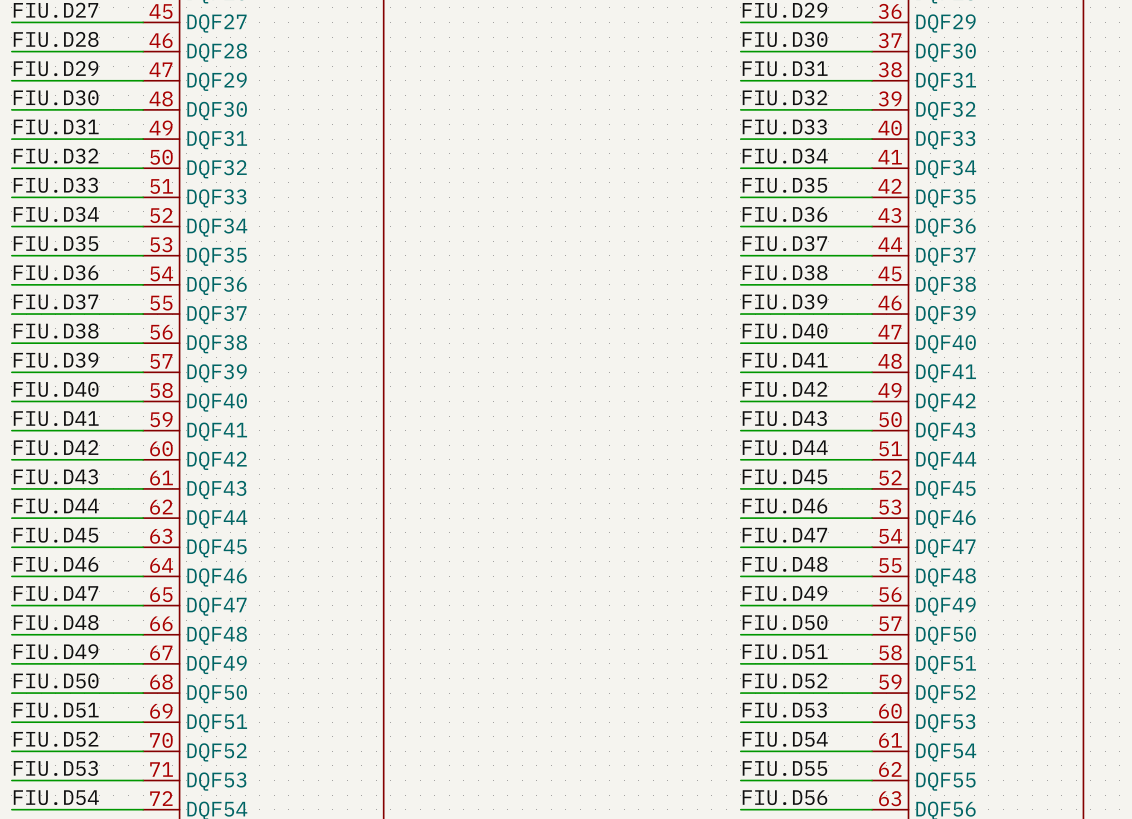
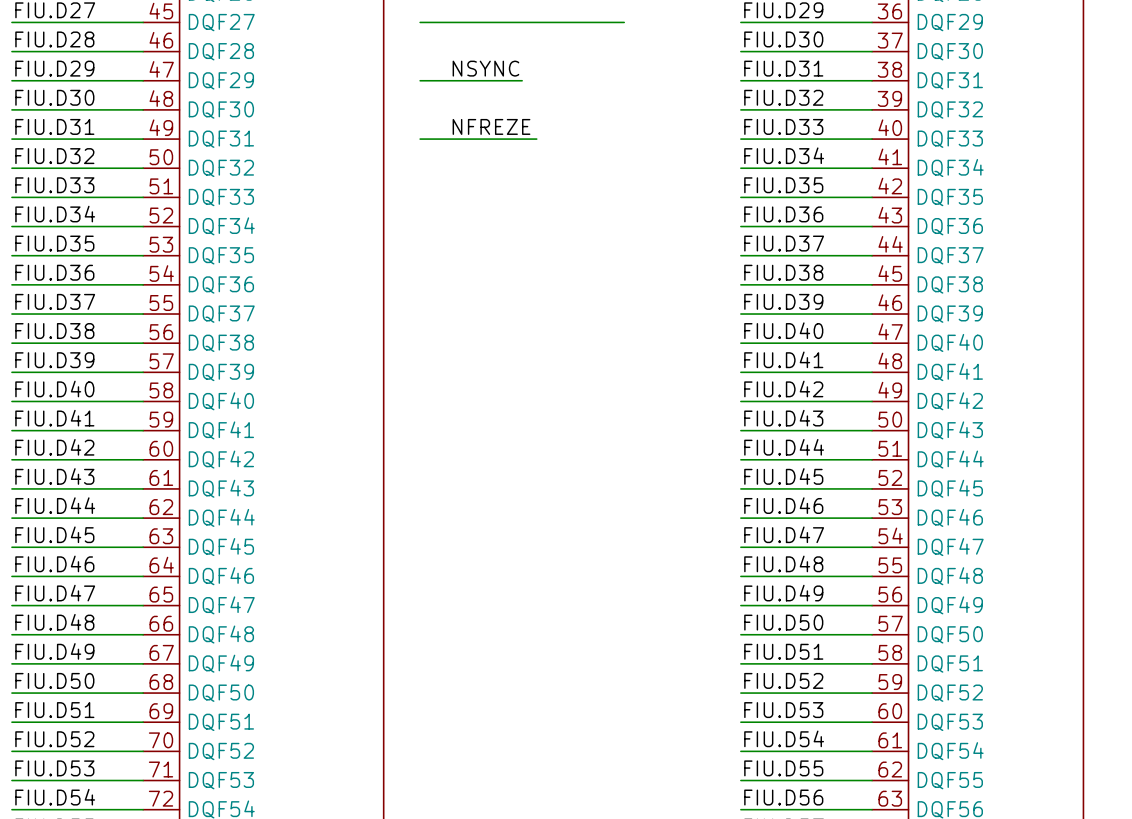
wire: none -> (420, 22) (624, 22)
label: none -> NSYNC (485, 68)
wire: none -> (420, 80) (522, 80)
label: none -> NFREZE (491, 126)
wire: none -> (420, 139) (536, 139)

